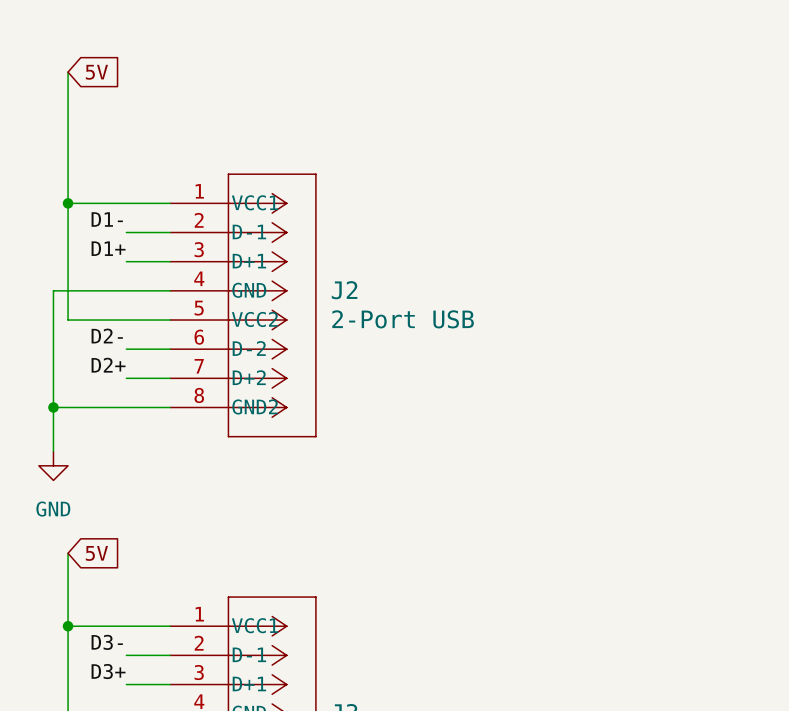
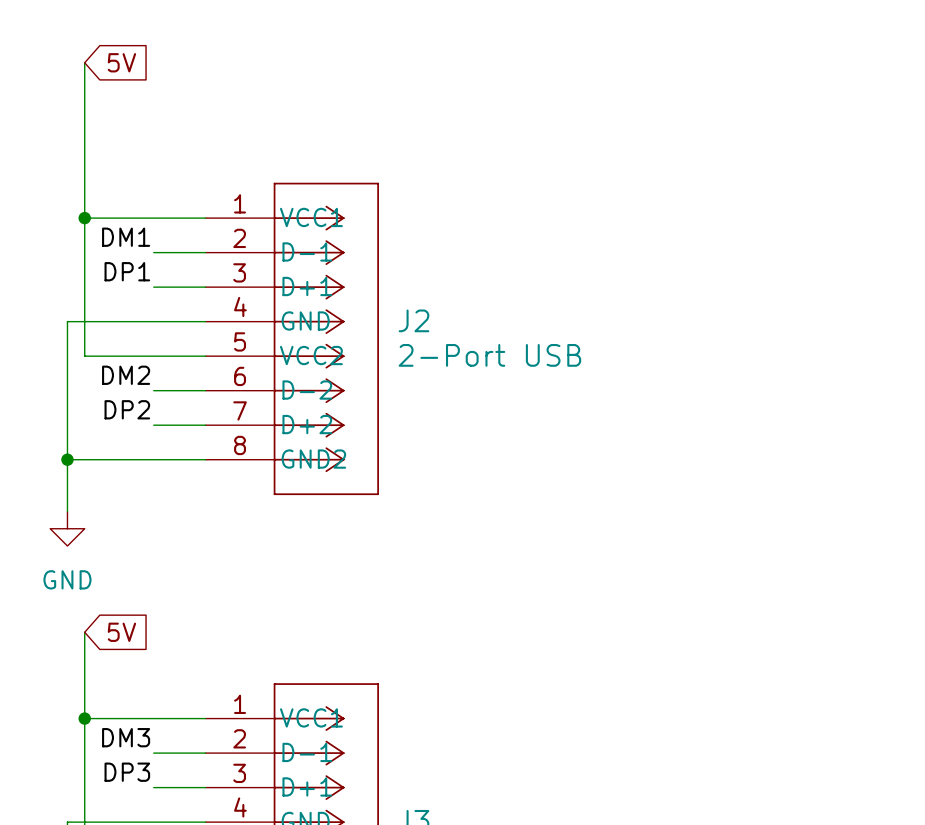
label: D1- (107, 219) -> DM1 (126, 237)
label: D1+ (108, 248) -> DP1 (127, 271)
label: D2- (107, 336) -> DM2 (126, 375)
label: D2+ (108, 365) -> DP2 (127, 409)
label: D3- (107, 642) -> DM3 (126, 737)
label: D3+ (108, 671) -> DP3 (127, 772)

